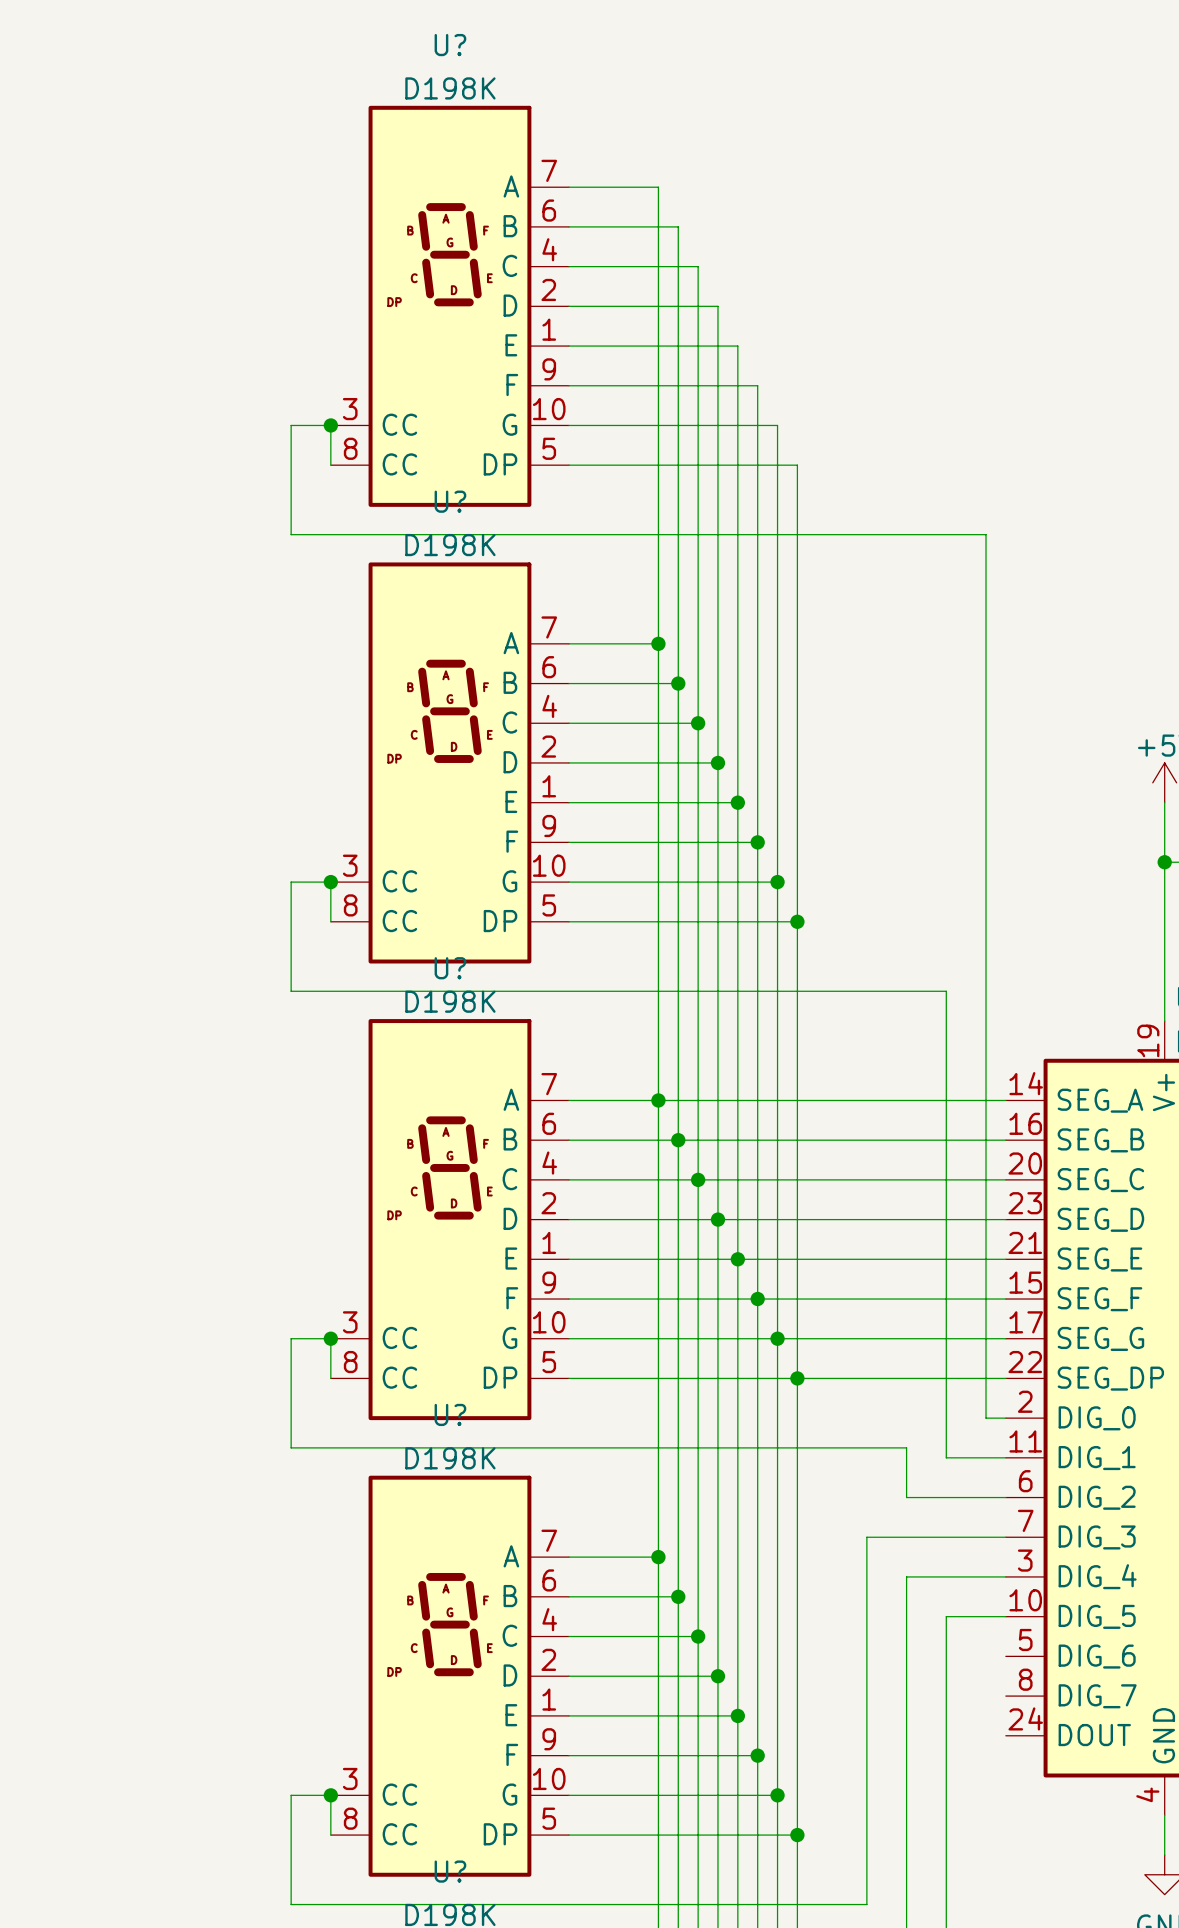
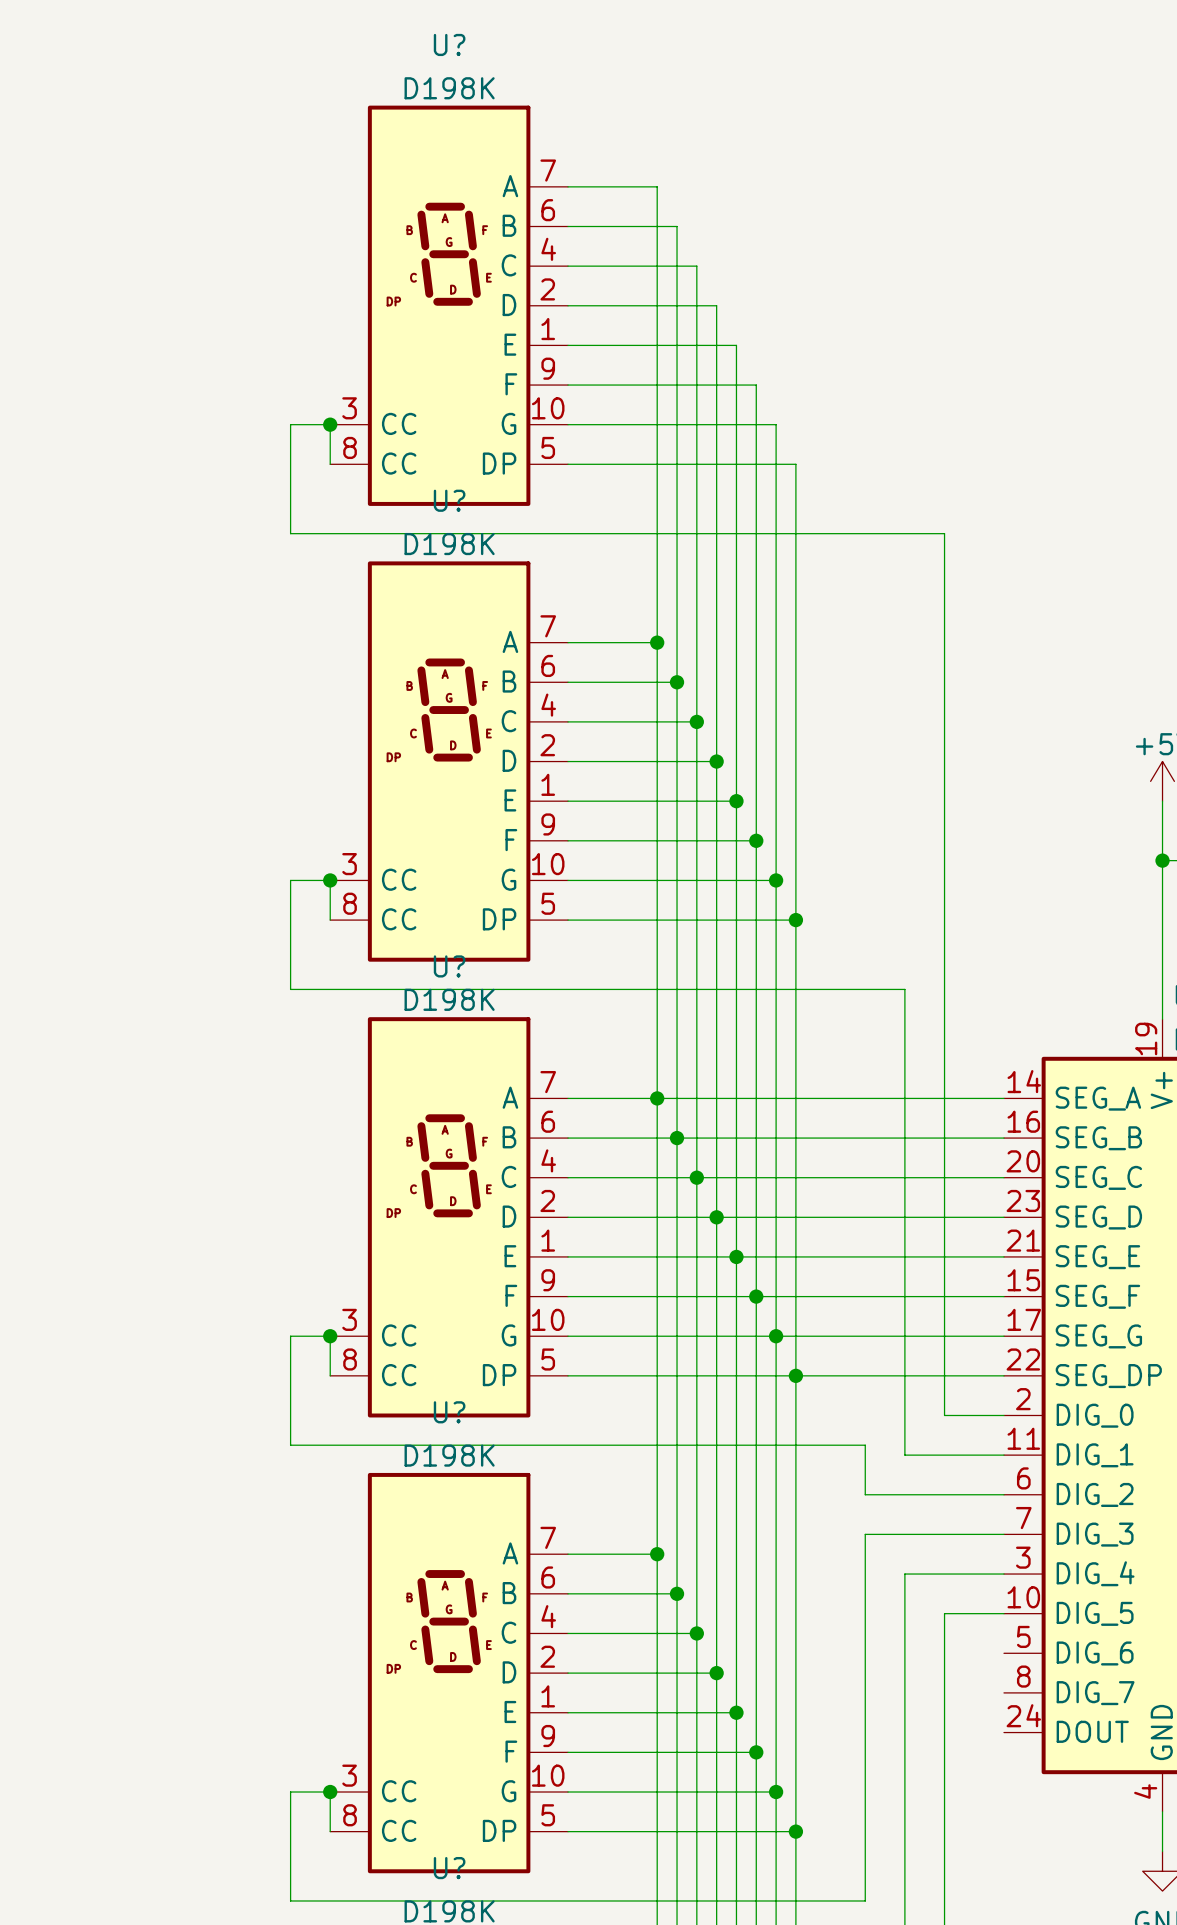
wire: (946, 534) (986, 534) (986, 1418) -> (944, 533) (944, 989)
wire: (906, 991) (946, 991) -> (904, 989) (904, 1445)
wire: (946, 1418) (946, 1457) -> (944, 1415) (984, 1415)
wire: (866, 1447) (906, 1447) -> (904, 1455) (944, 1455)
wire: (906, 1457) (906, 1497) -> (865, 1445) (865, 1494) (904, 1494)

